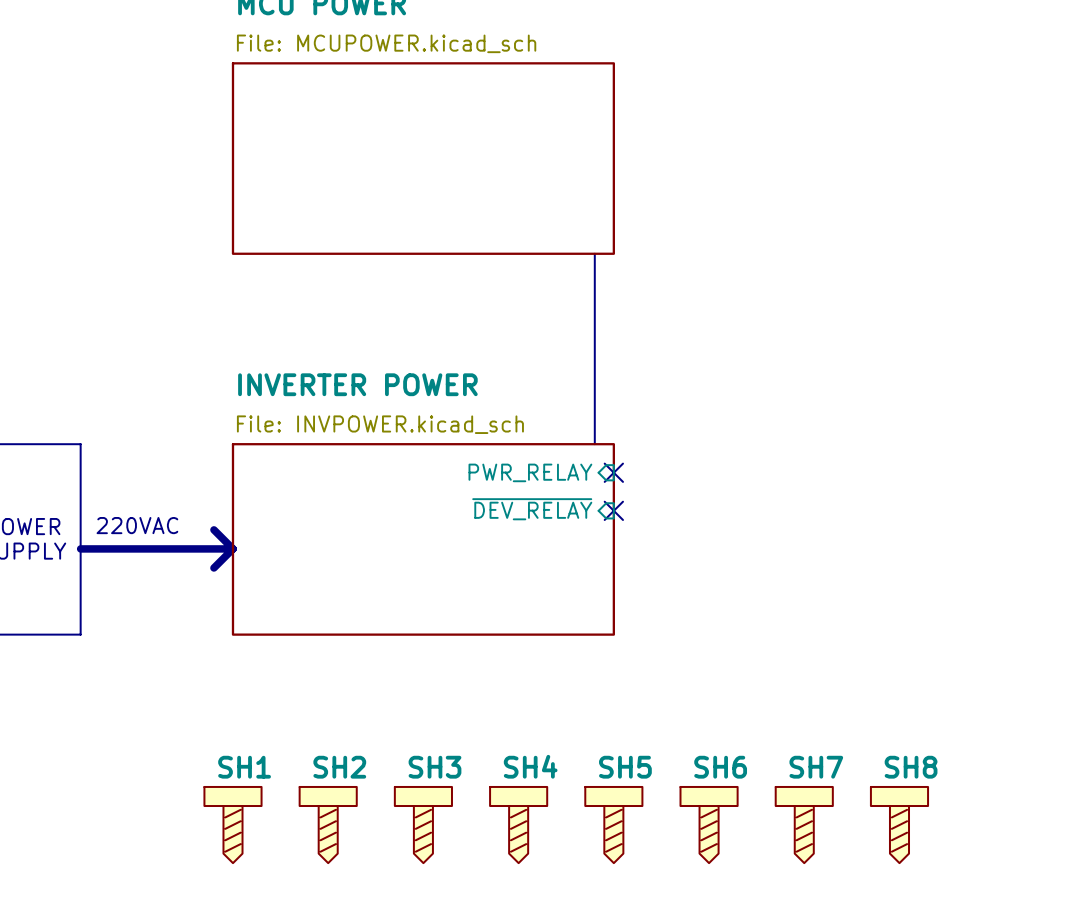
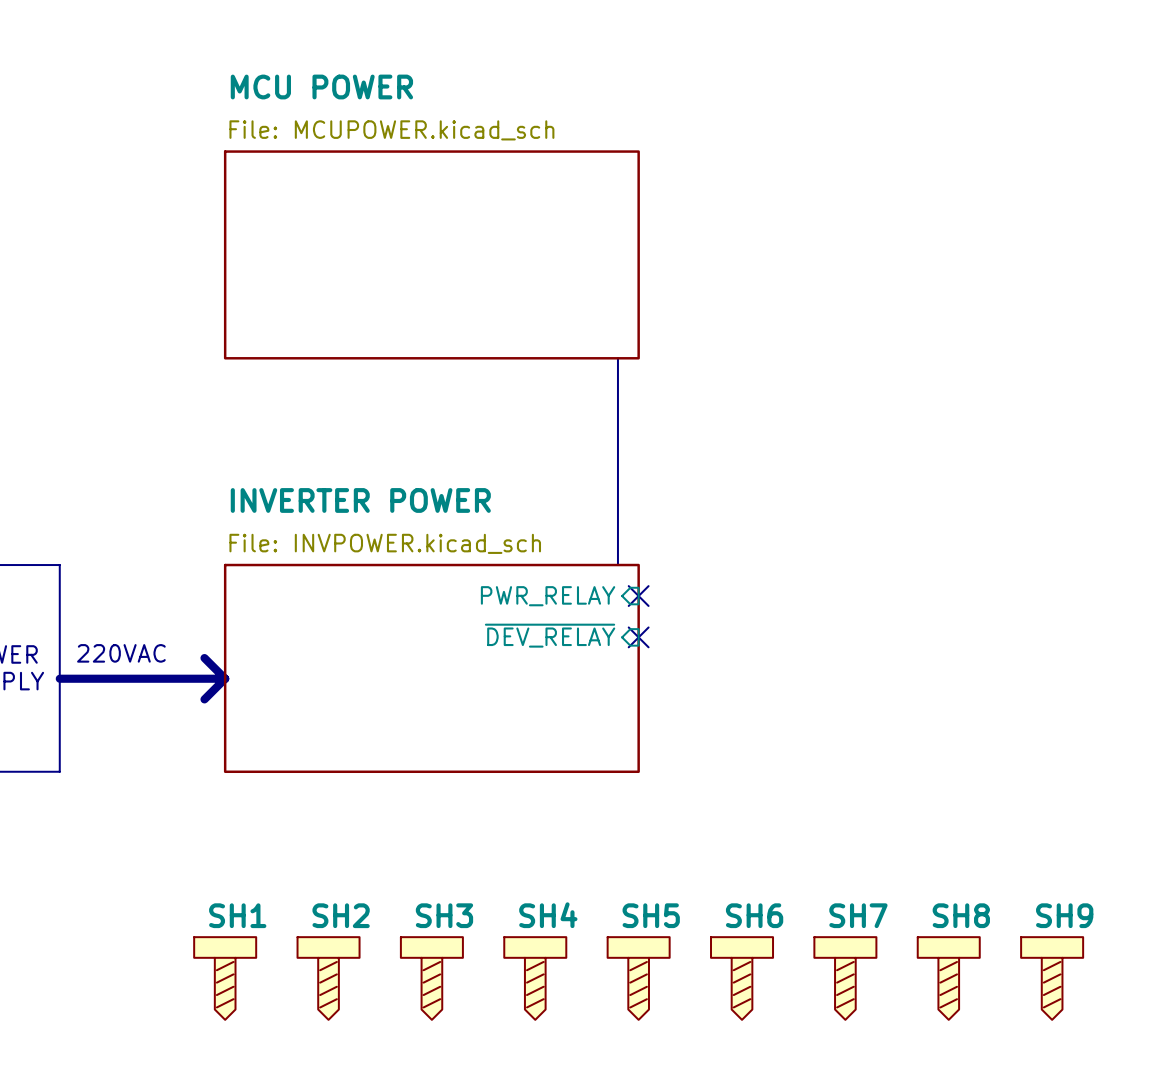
SH9: none -> (1052, 978)

